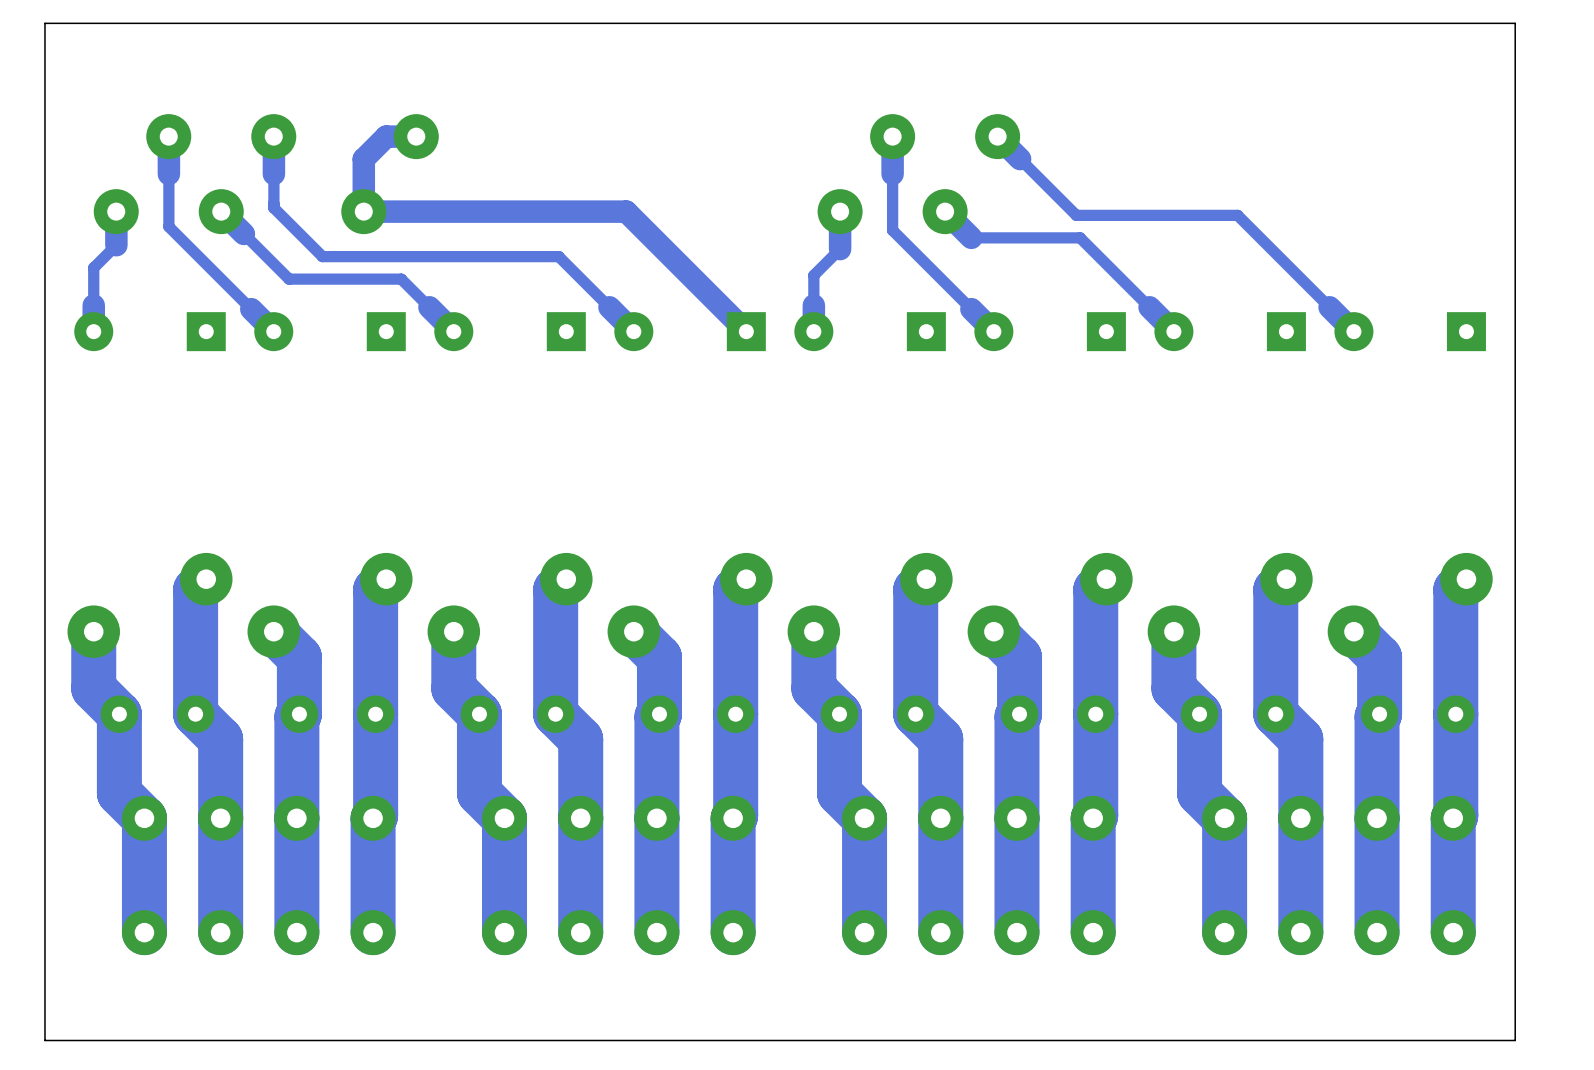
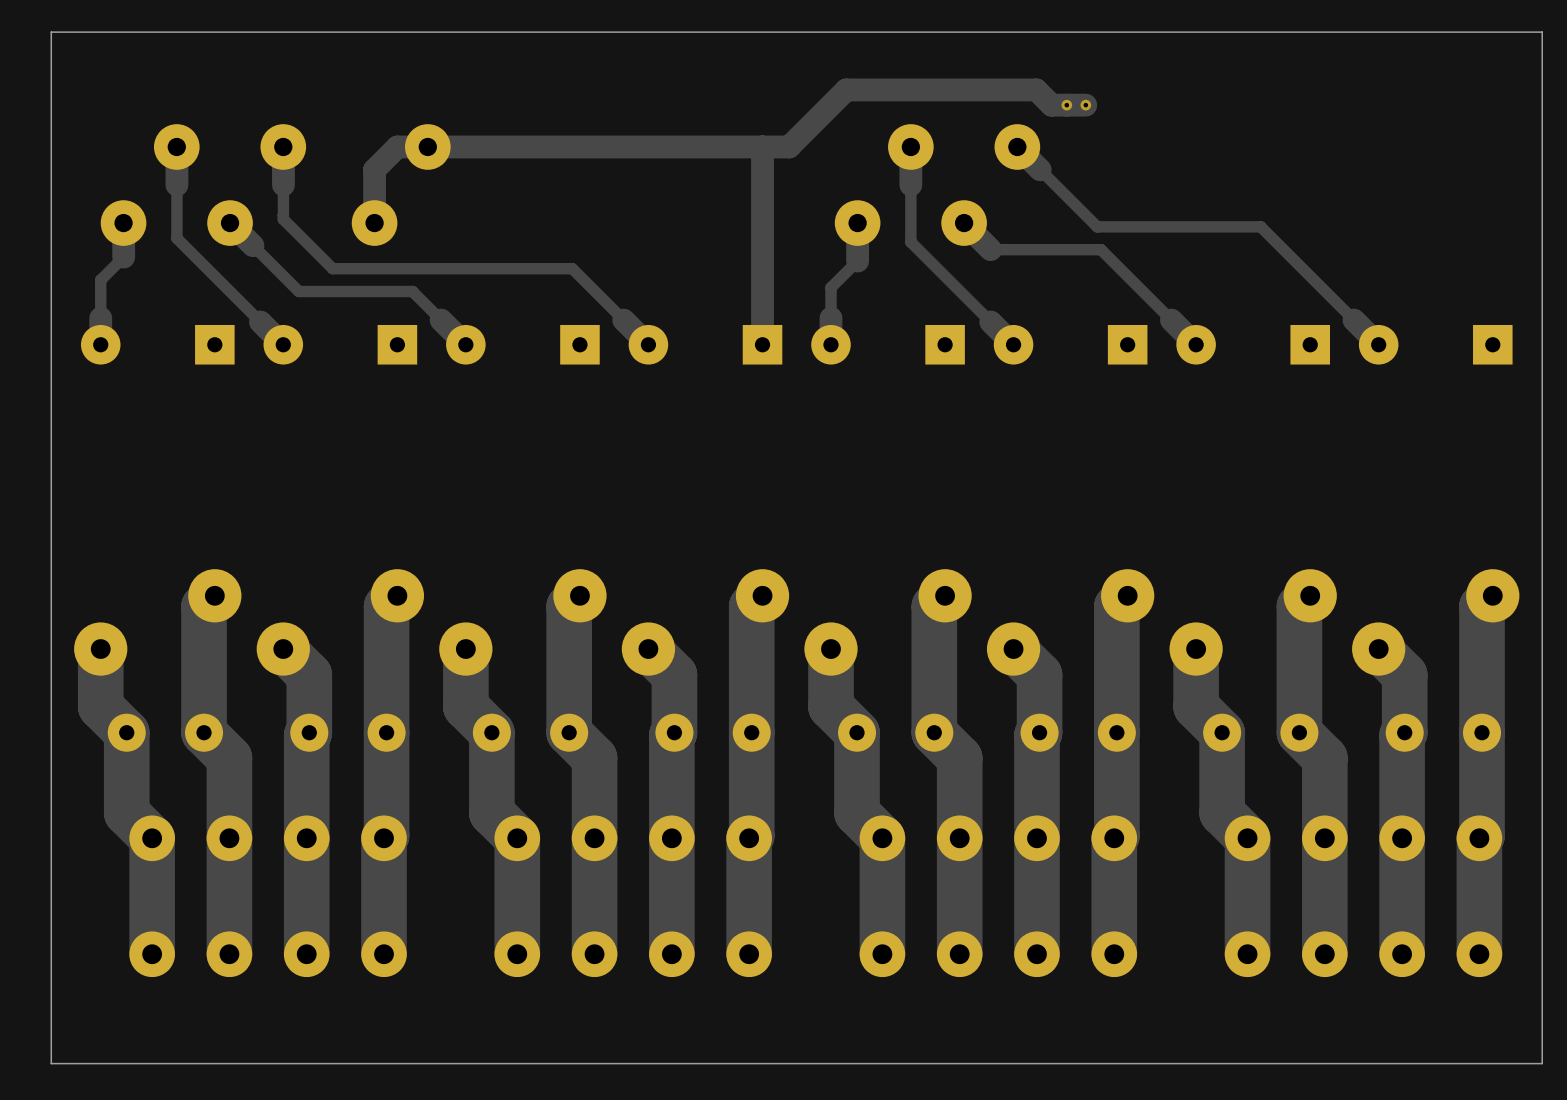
via: none -> (1066, 105)
track: none -> (1085, 105) (1051, 105) (1036, 89) (846, 89) (789, 146) (427, 146)
via: none -> (1085, 105)
track: (363, 211) (626, 211) (746, 331) -> (762, 146) (762, 344)

